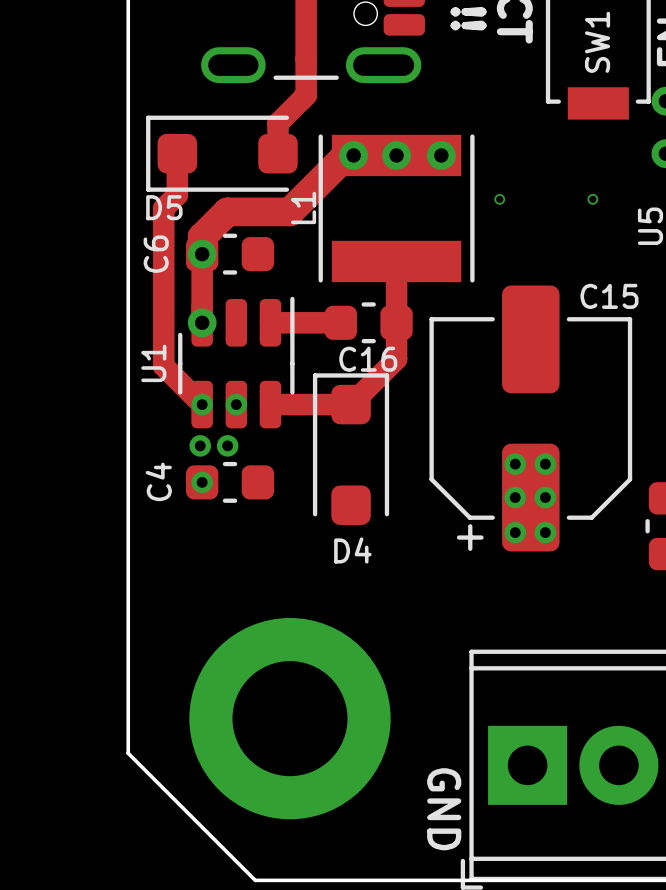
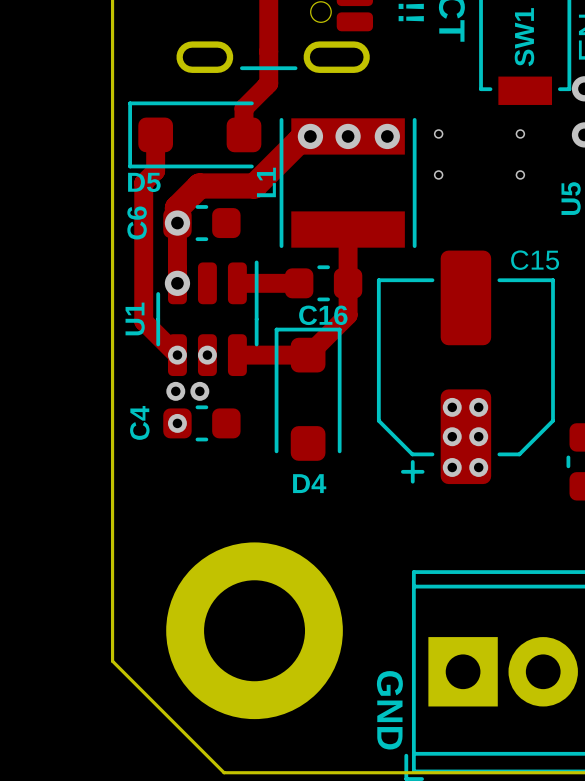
via: none -> (438, 133)
via: none -> (520, 133)

